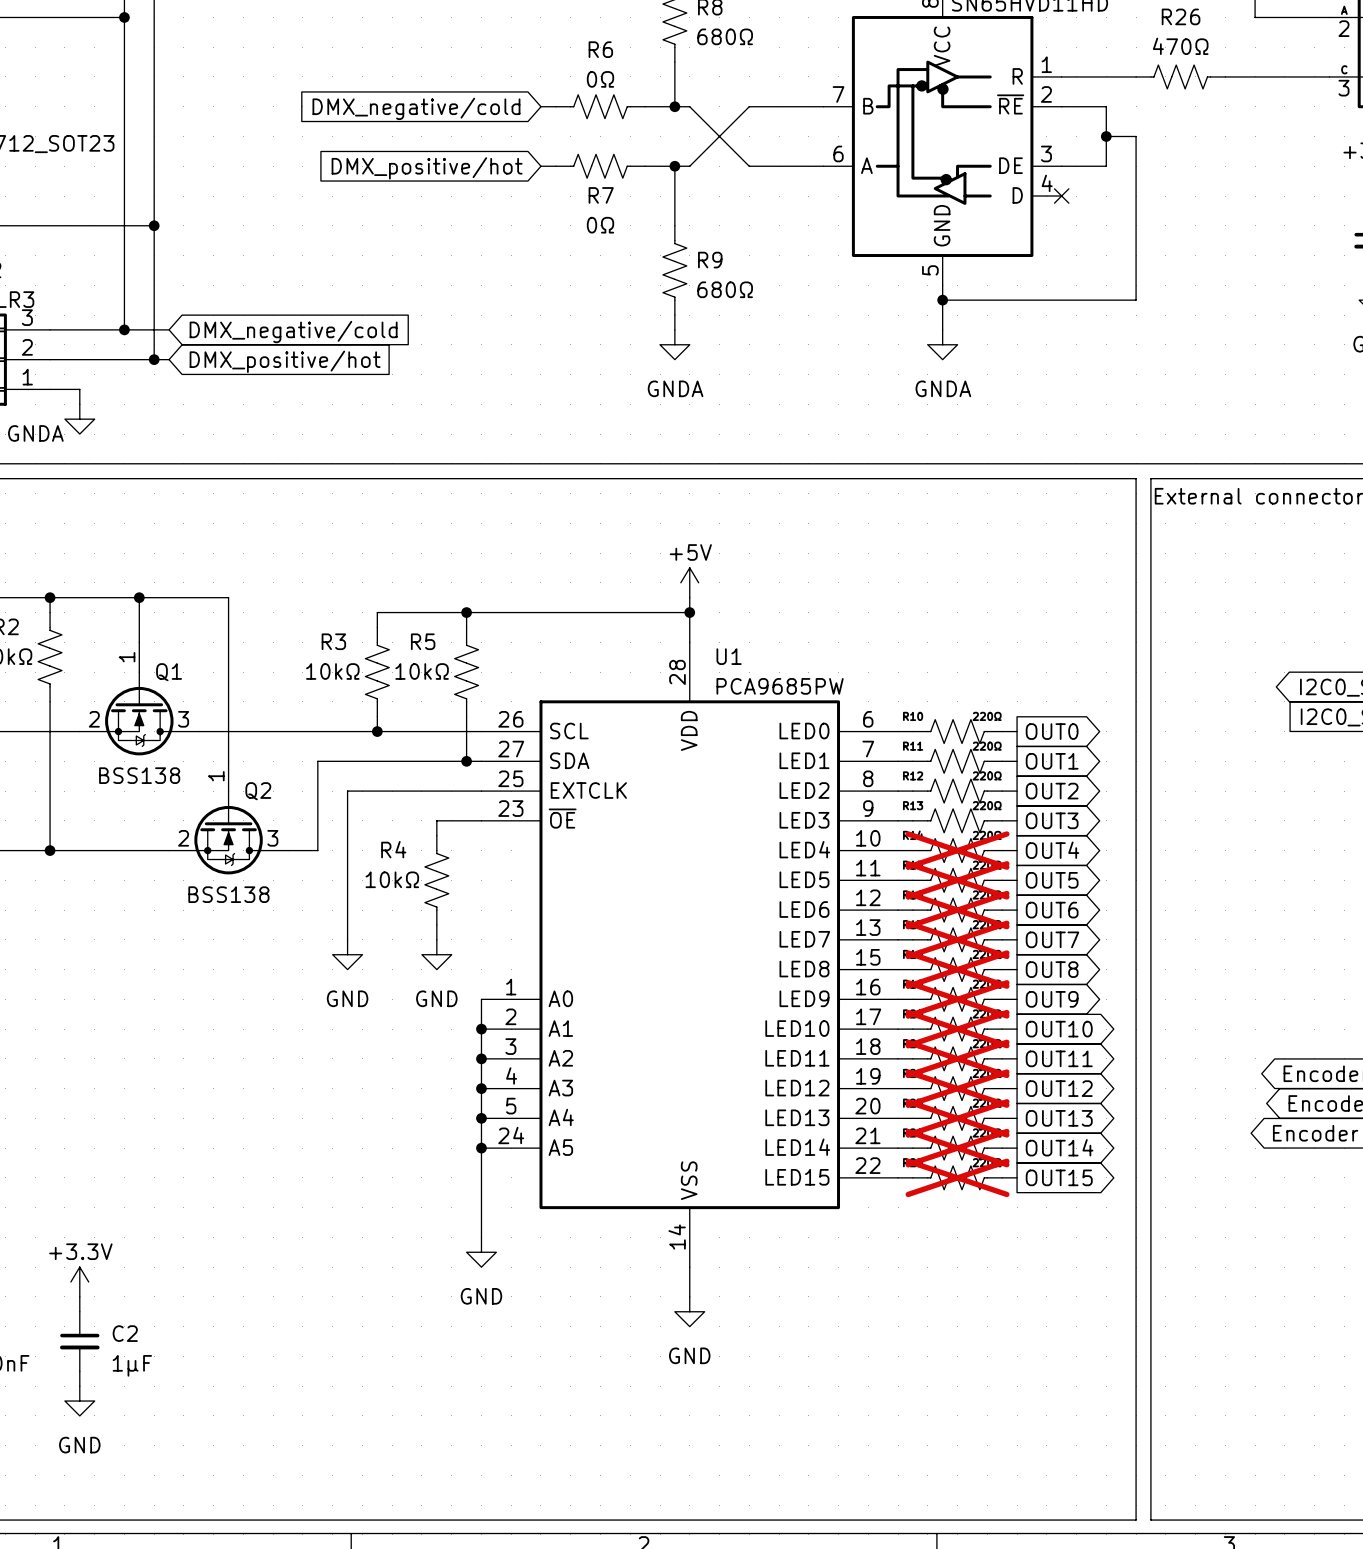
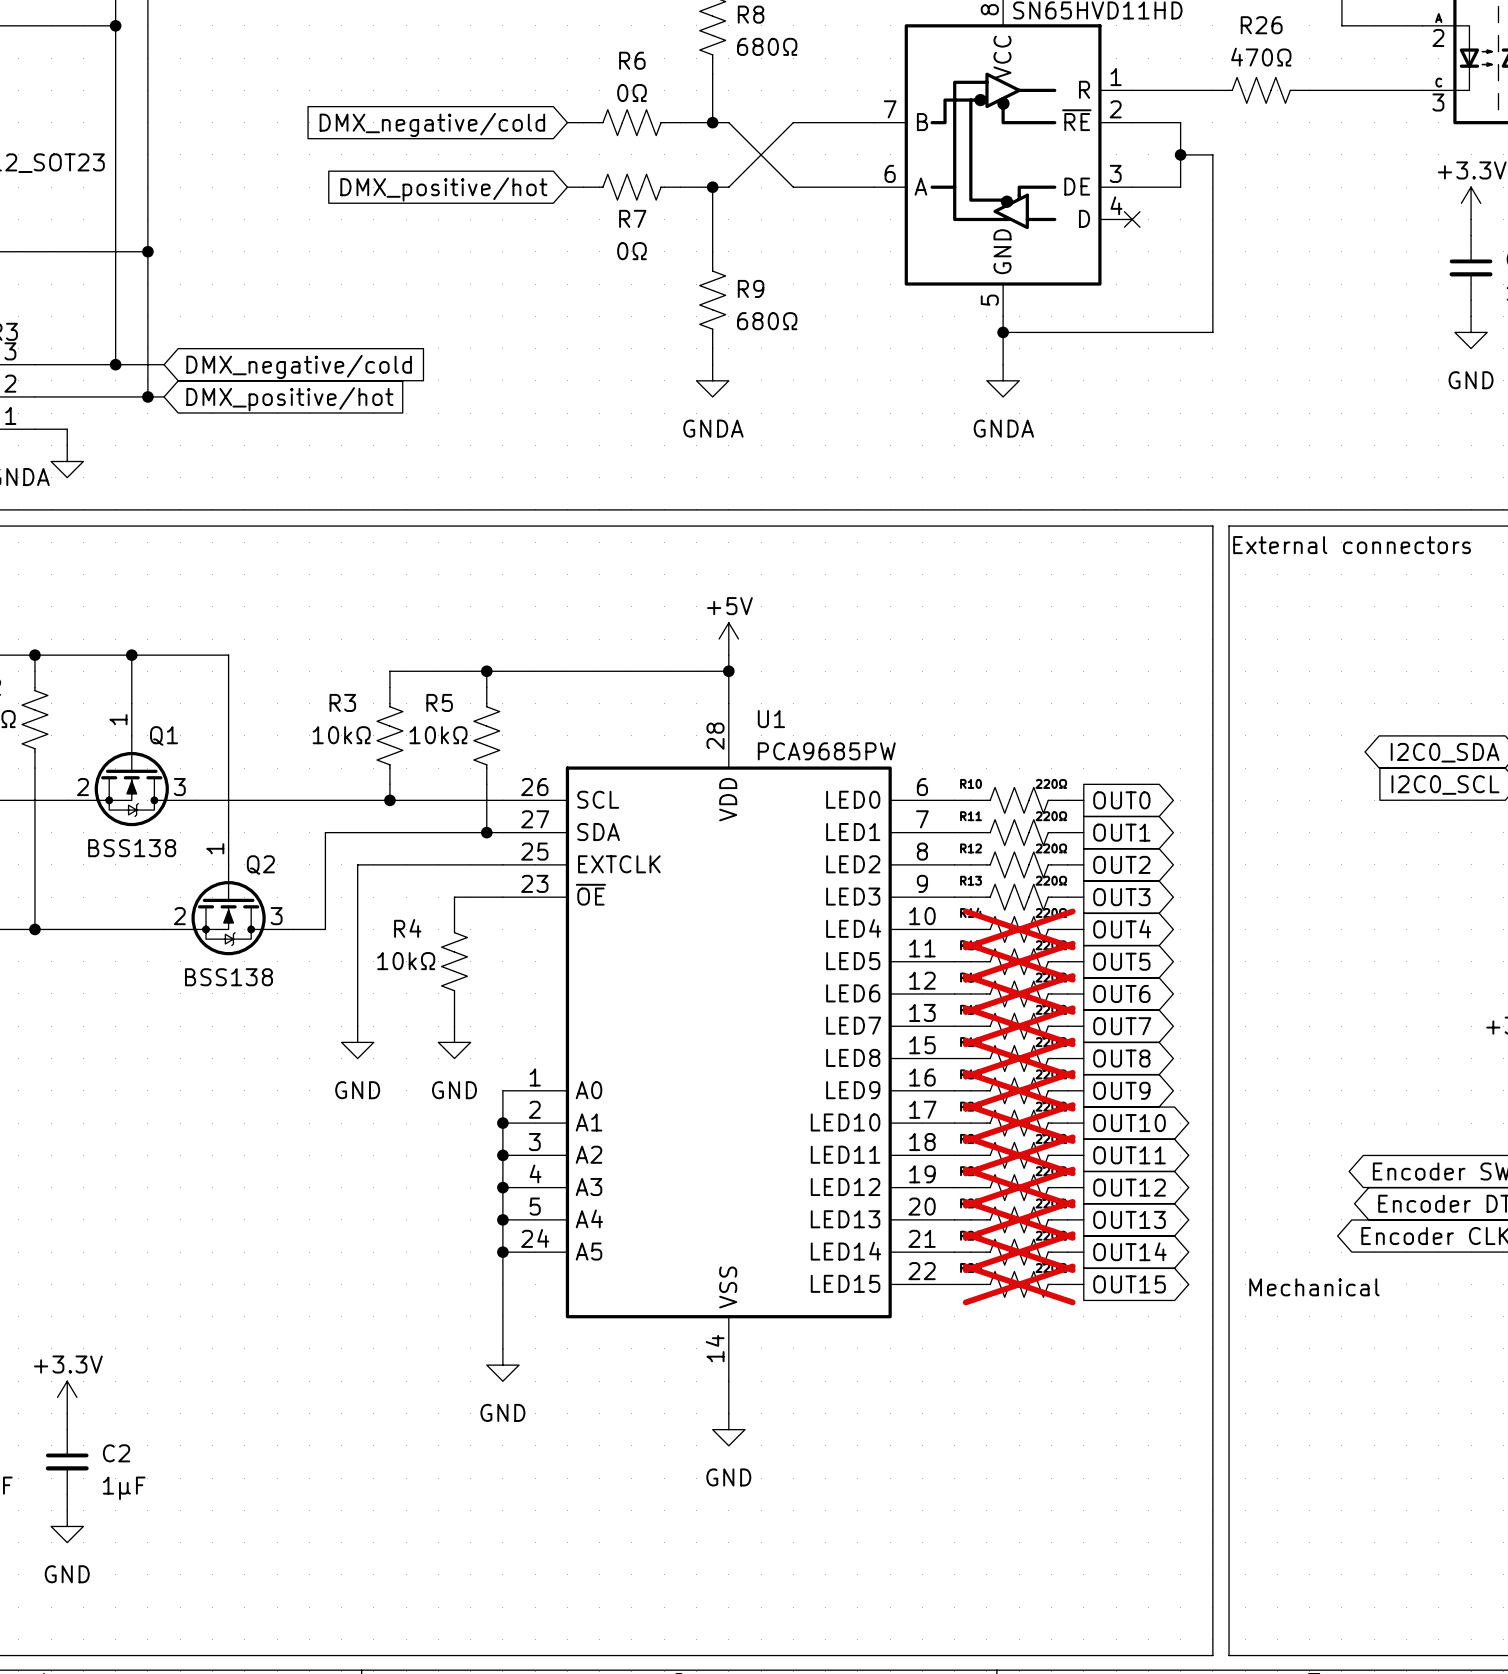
text: none -> Mechanical (1314, 1287)

